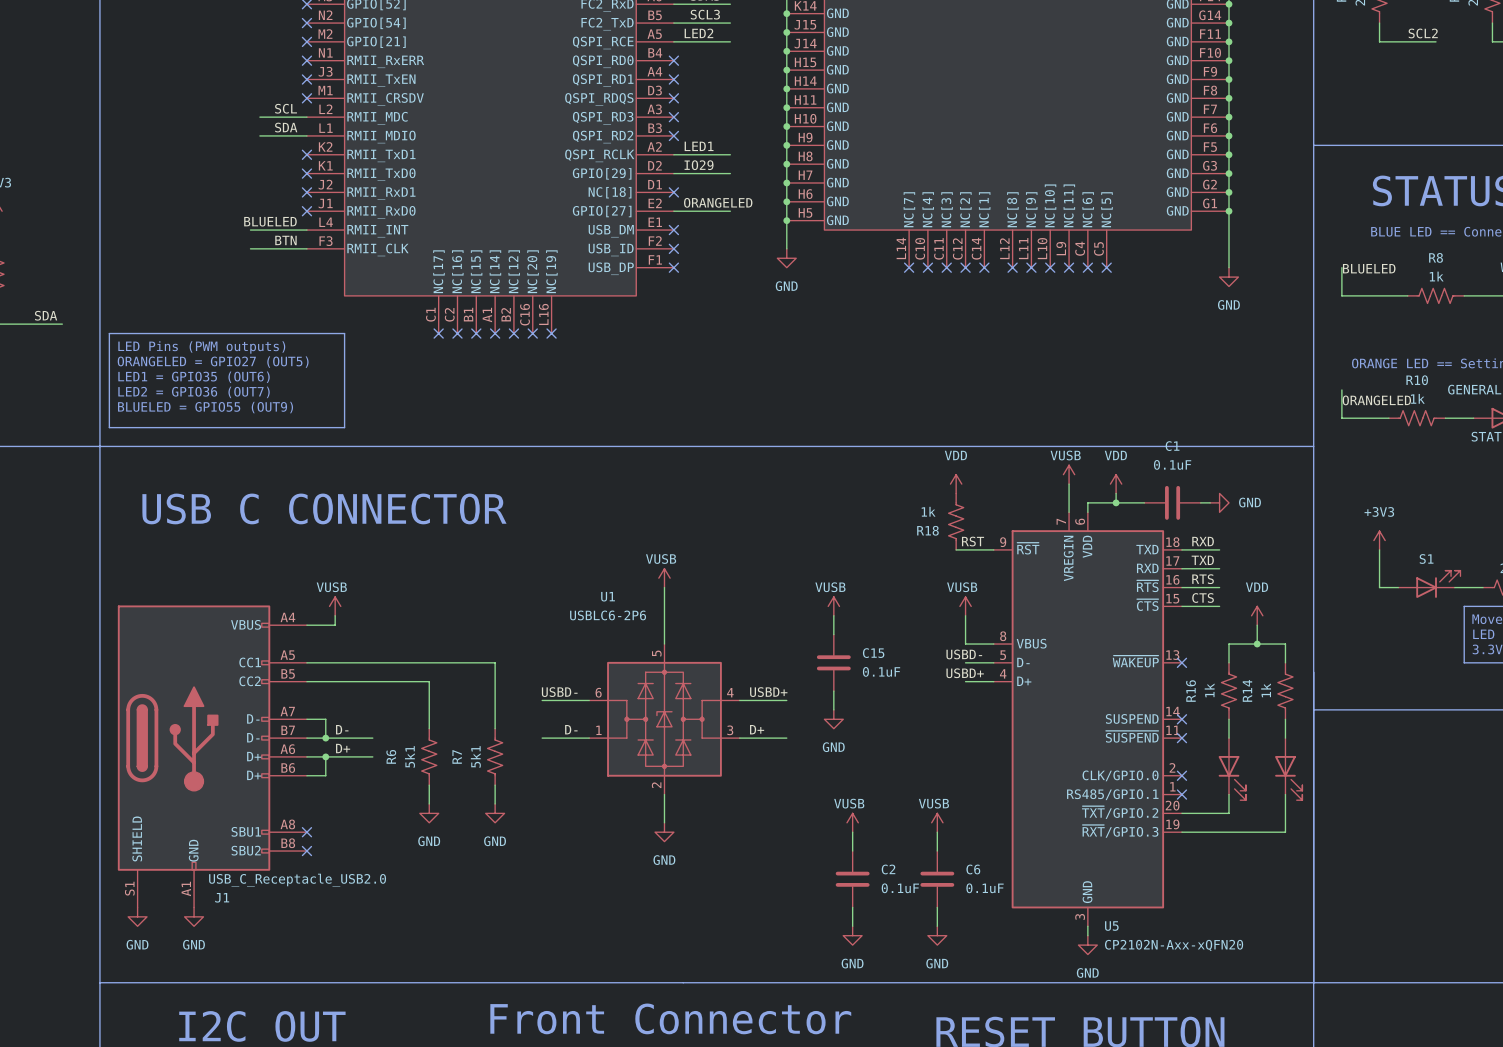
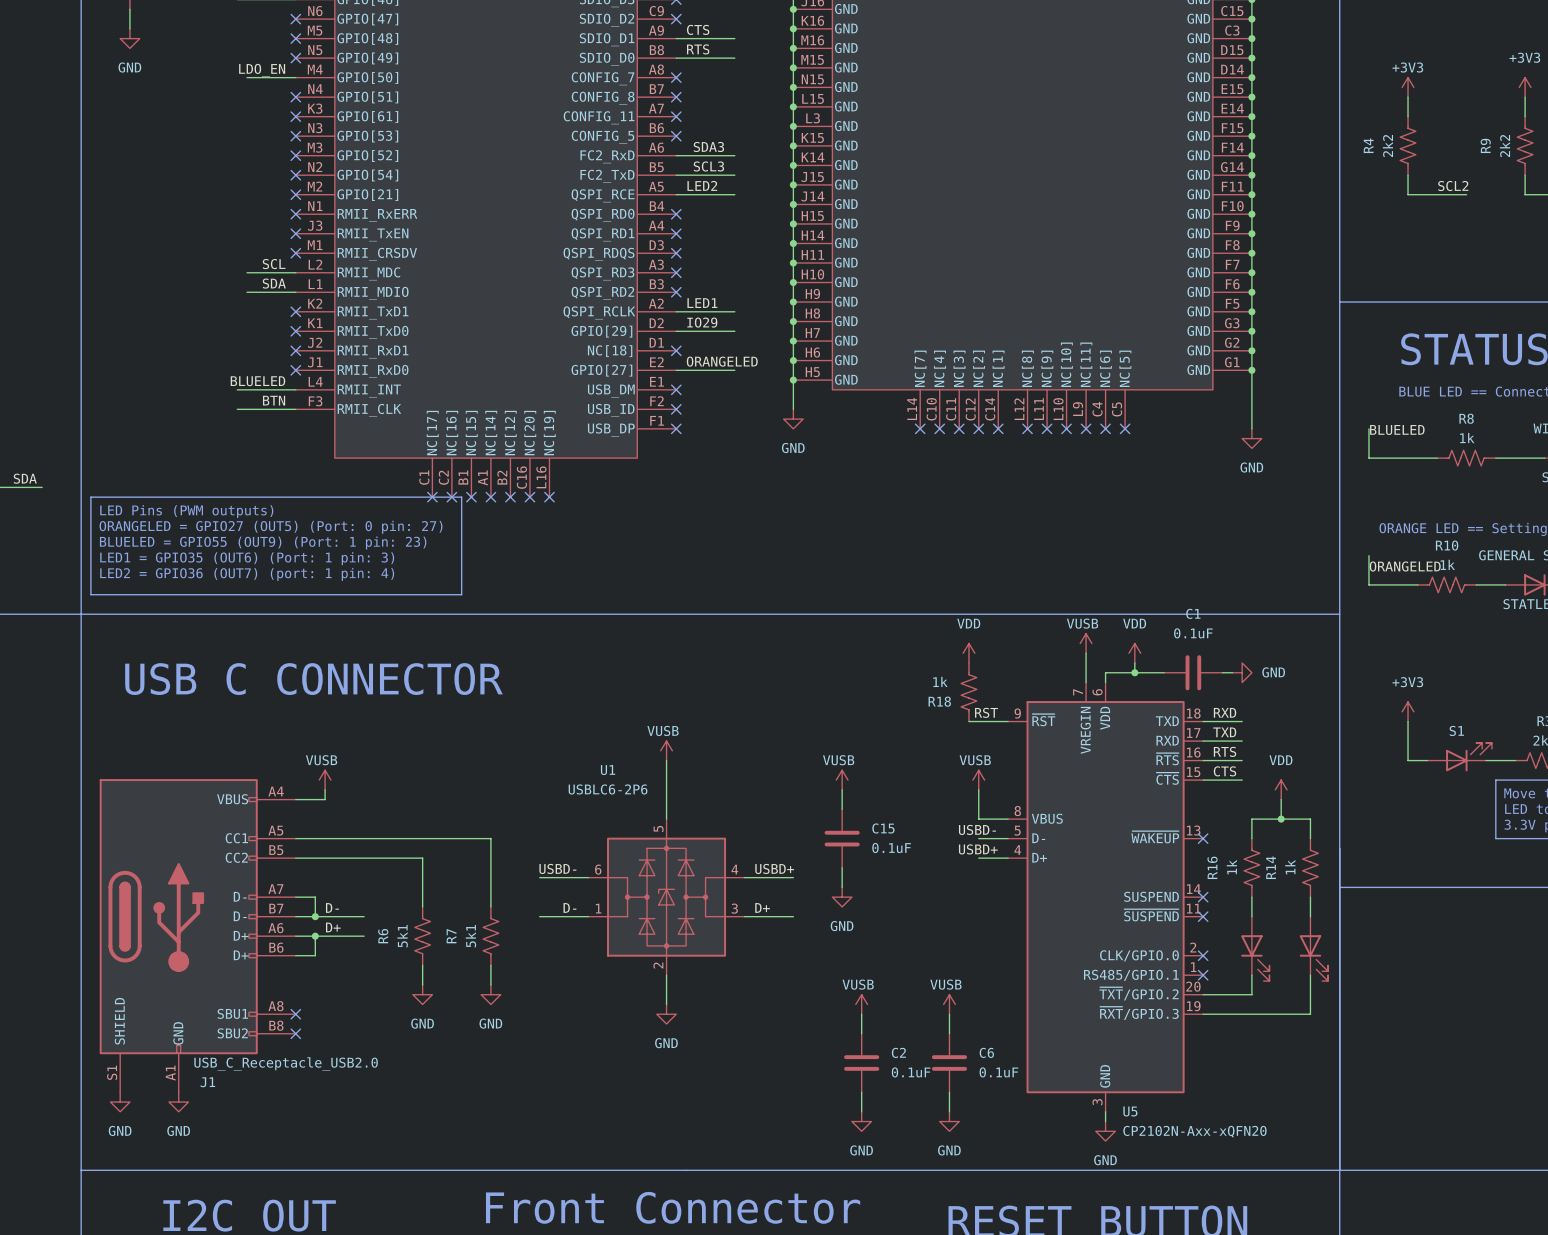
line: (344, 333) (344, 427) -> (334, 497) (461, 497) (461, 594) (334, 594)
text: ORANGELED = GPIO27 (OUT5) (213, 362) -> ORANGELED = GPIO27 (OUT5) (Port: 0 pin: 27) (271, 527)
text: LED1 = GPIO35 (OUT6) (194, 377) -> BLUELED = GPIO55 (OUT9) (Port: 1 pin: 23) (263, 542)
text: LED2 = GPIO36 (OUT7) (194, 392) -> LED1 = GPIO35 (OUT6) (Port: 1 pin: 3) (247, 558)
text: BLUELED = GPIO55 (OUT9) (205, 407) -> LED2 = GPIO36 (OUT7) (port: 1 pin: 4) (247, 574)

